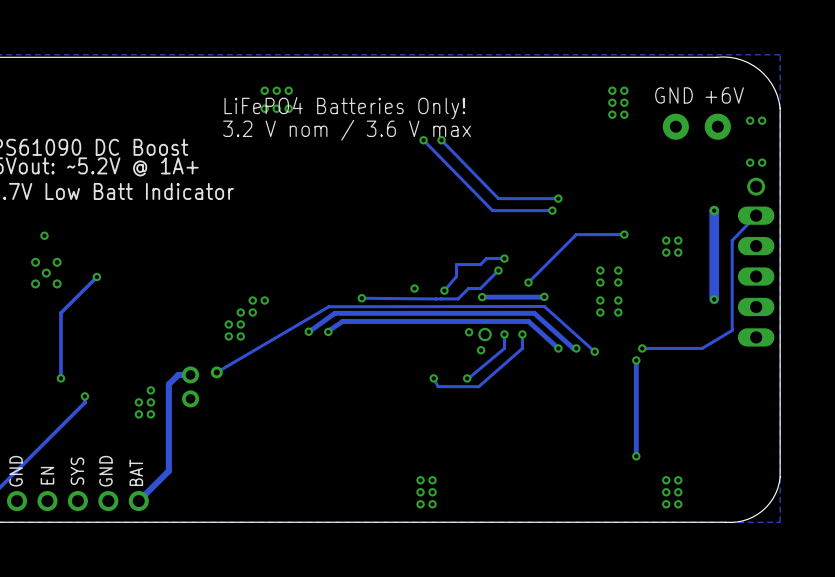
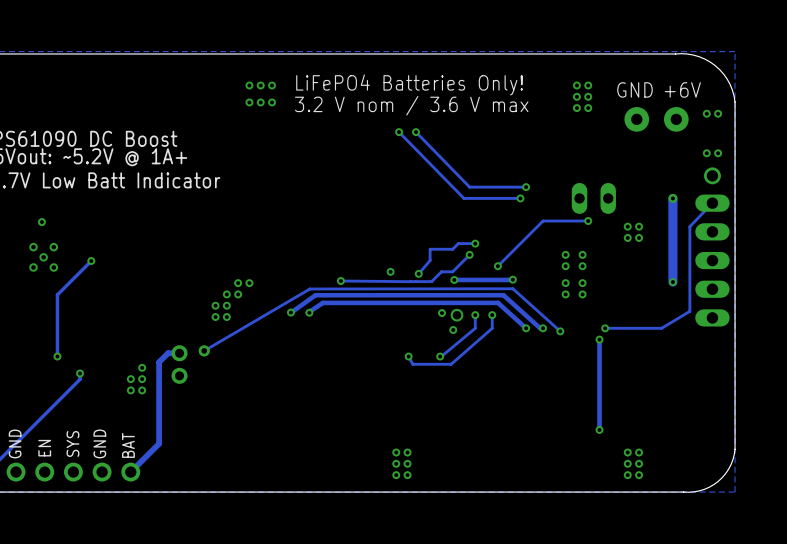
text position: LiFePO4 Batteries Only! (344, 108) -> LiFePO4 Batteries Only! (409, 84)
text position: 3.2 V nom / 3.6 V max (347, 130) -> 3.2 V nom / 3.6 V max (411, 105)
part: none -> (593, 198)

